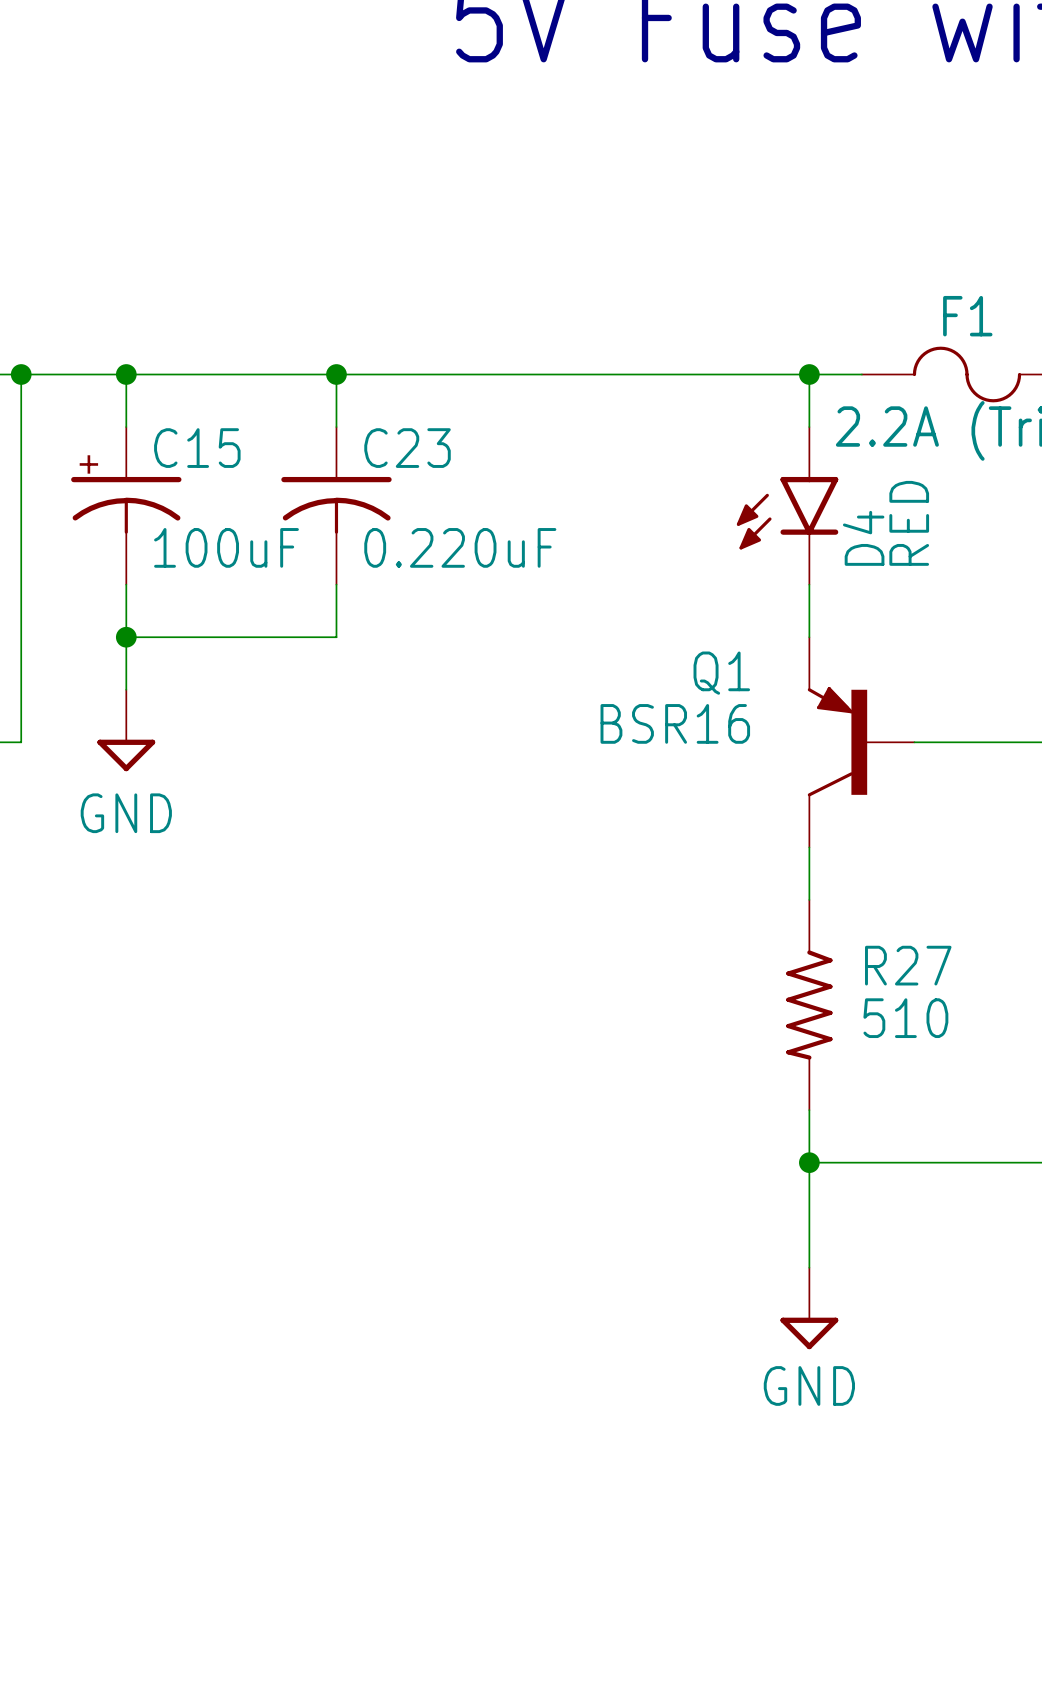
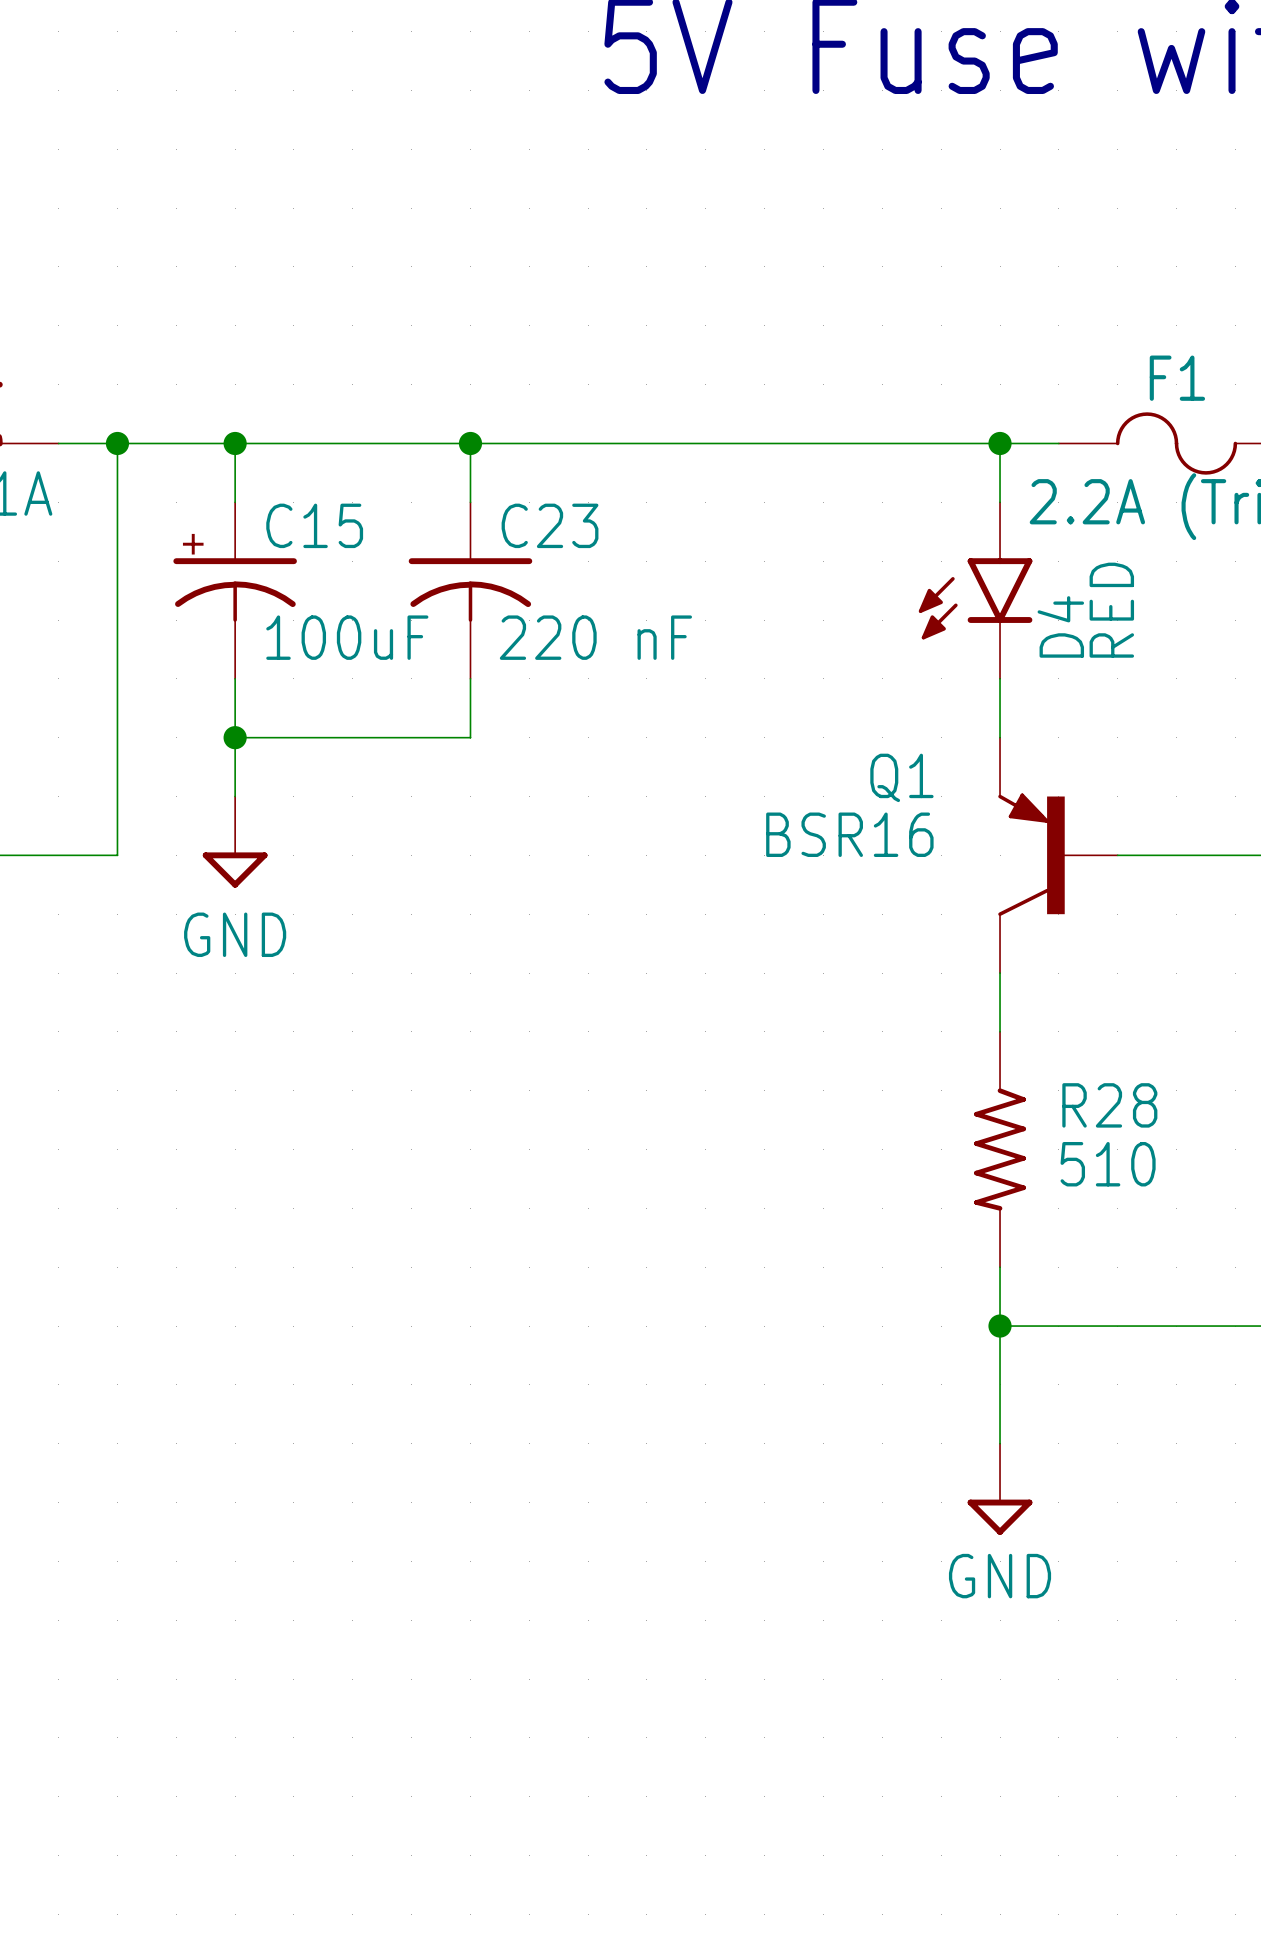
C23 value: 0.220uF (460, 547) -> 220 nF (595, 637)
R27 name: R27 (908, 965) -> R28 (1109, 1105)

